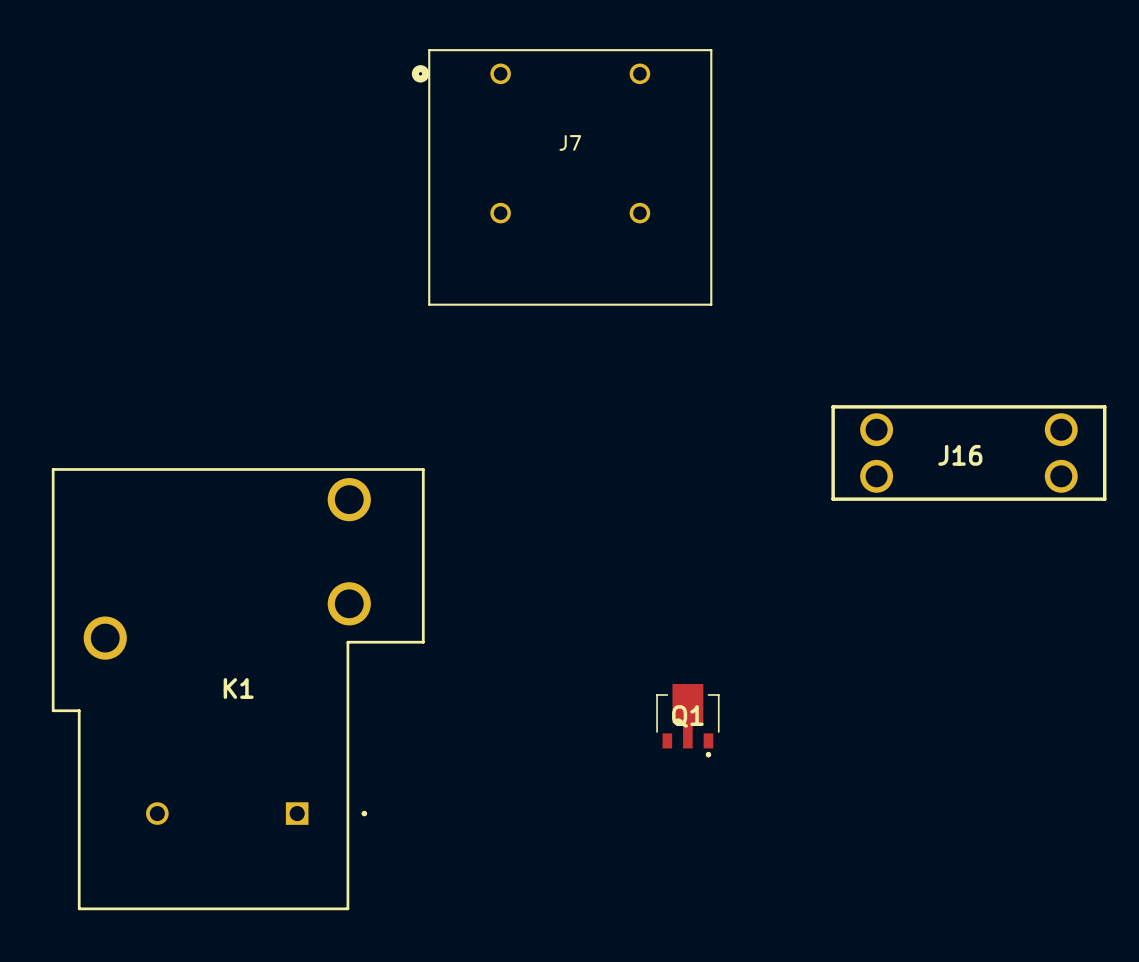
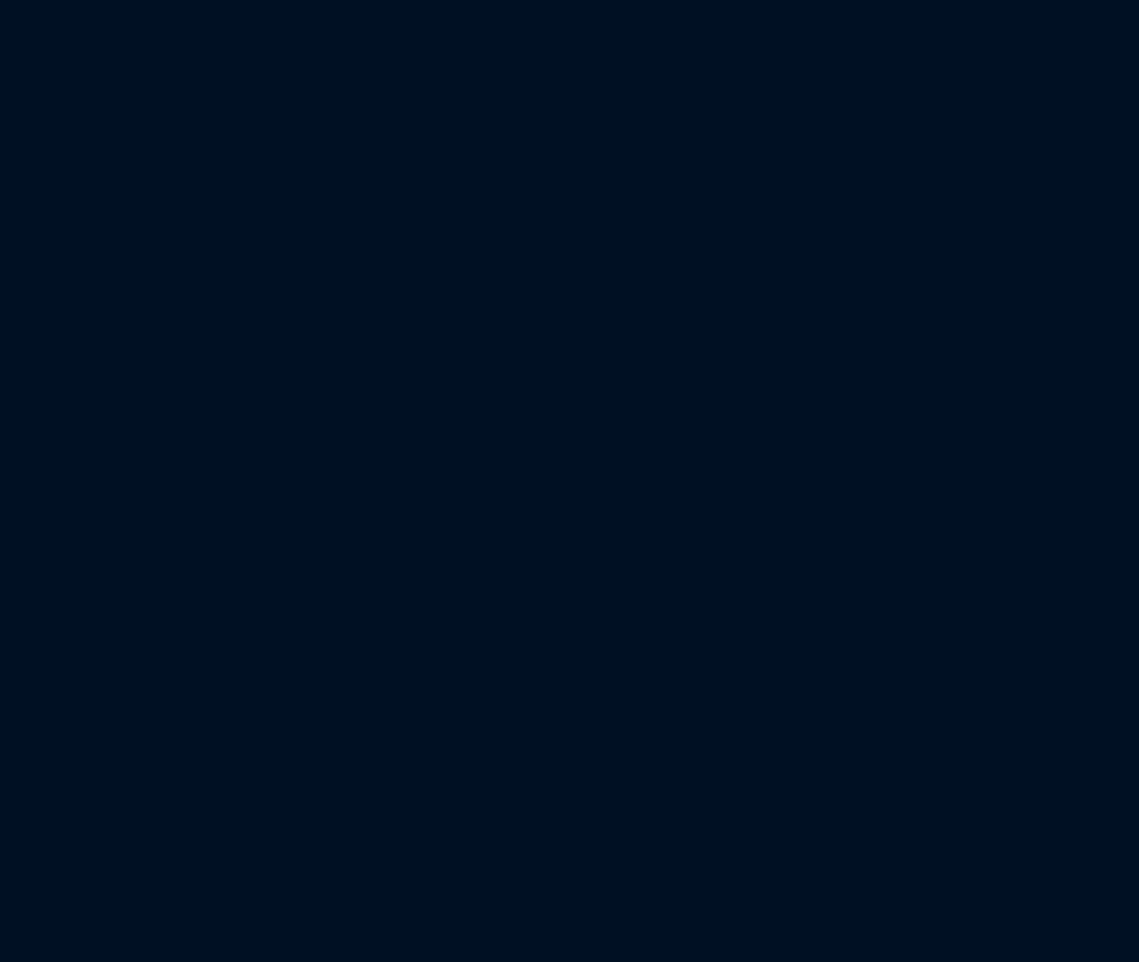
J7: (562, 177) -> none
J16: (968, 453) -> none
K1: (238, 689) -> none
Q1: (687, 720) -> none

